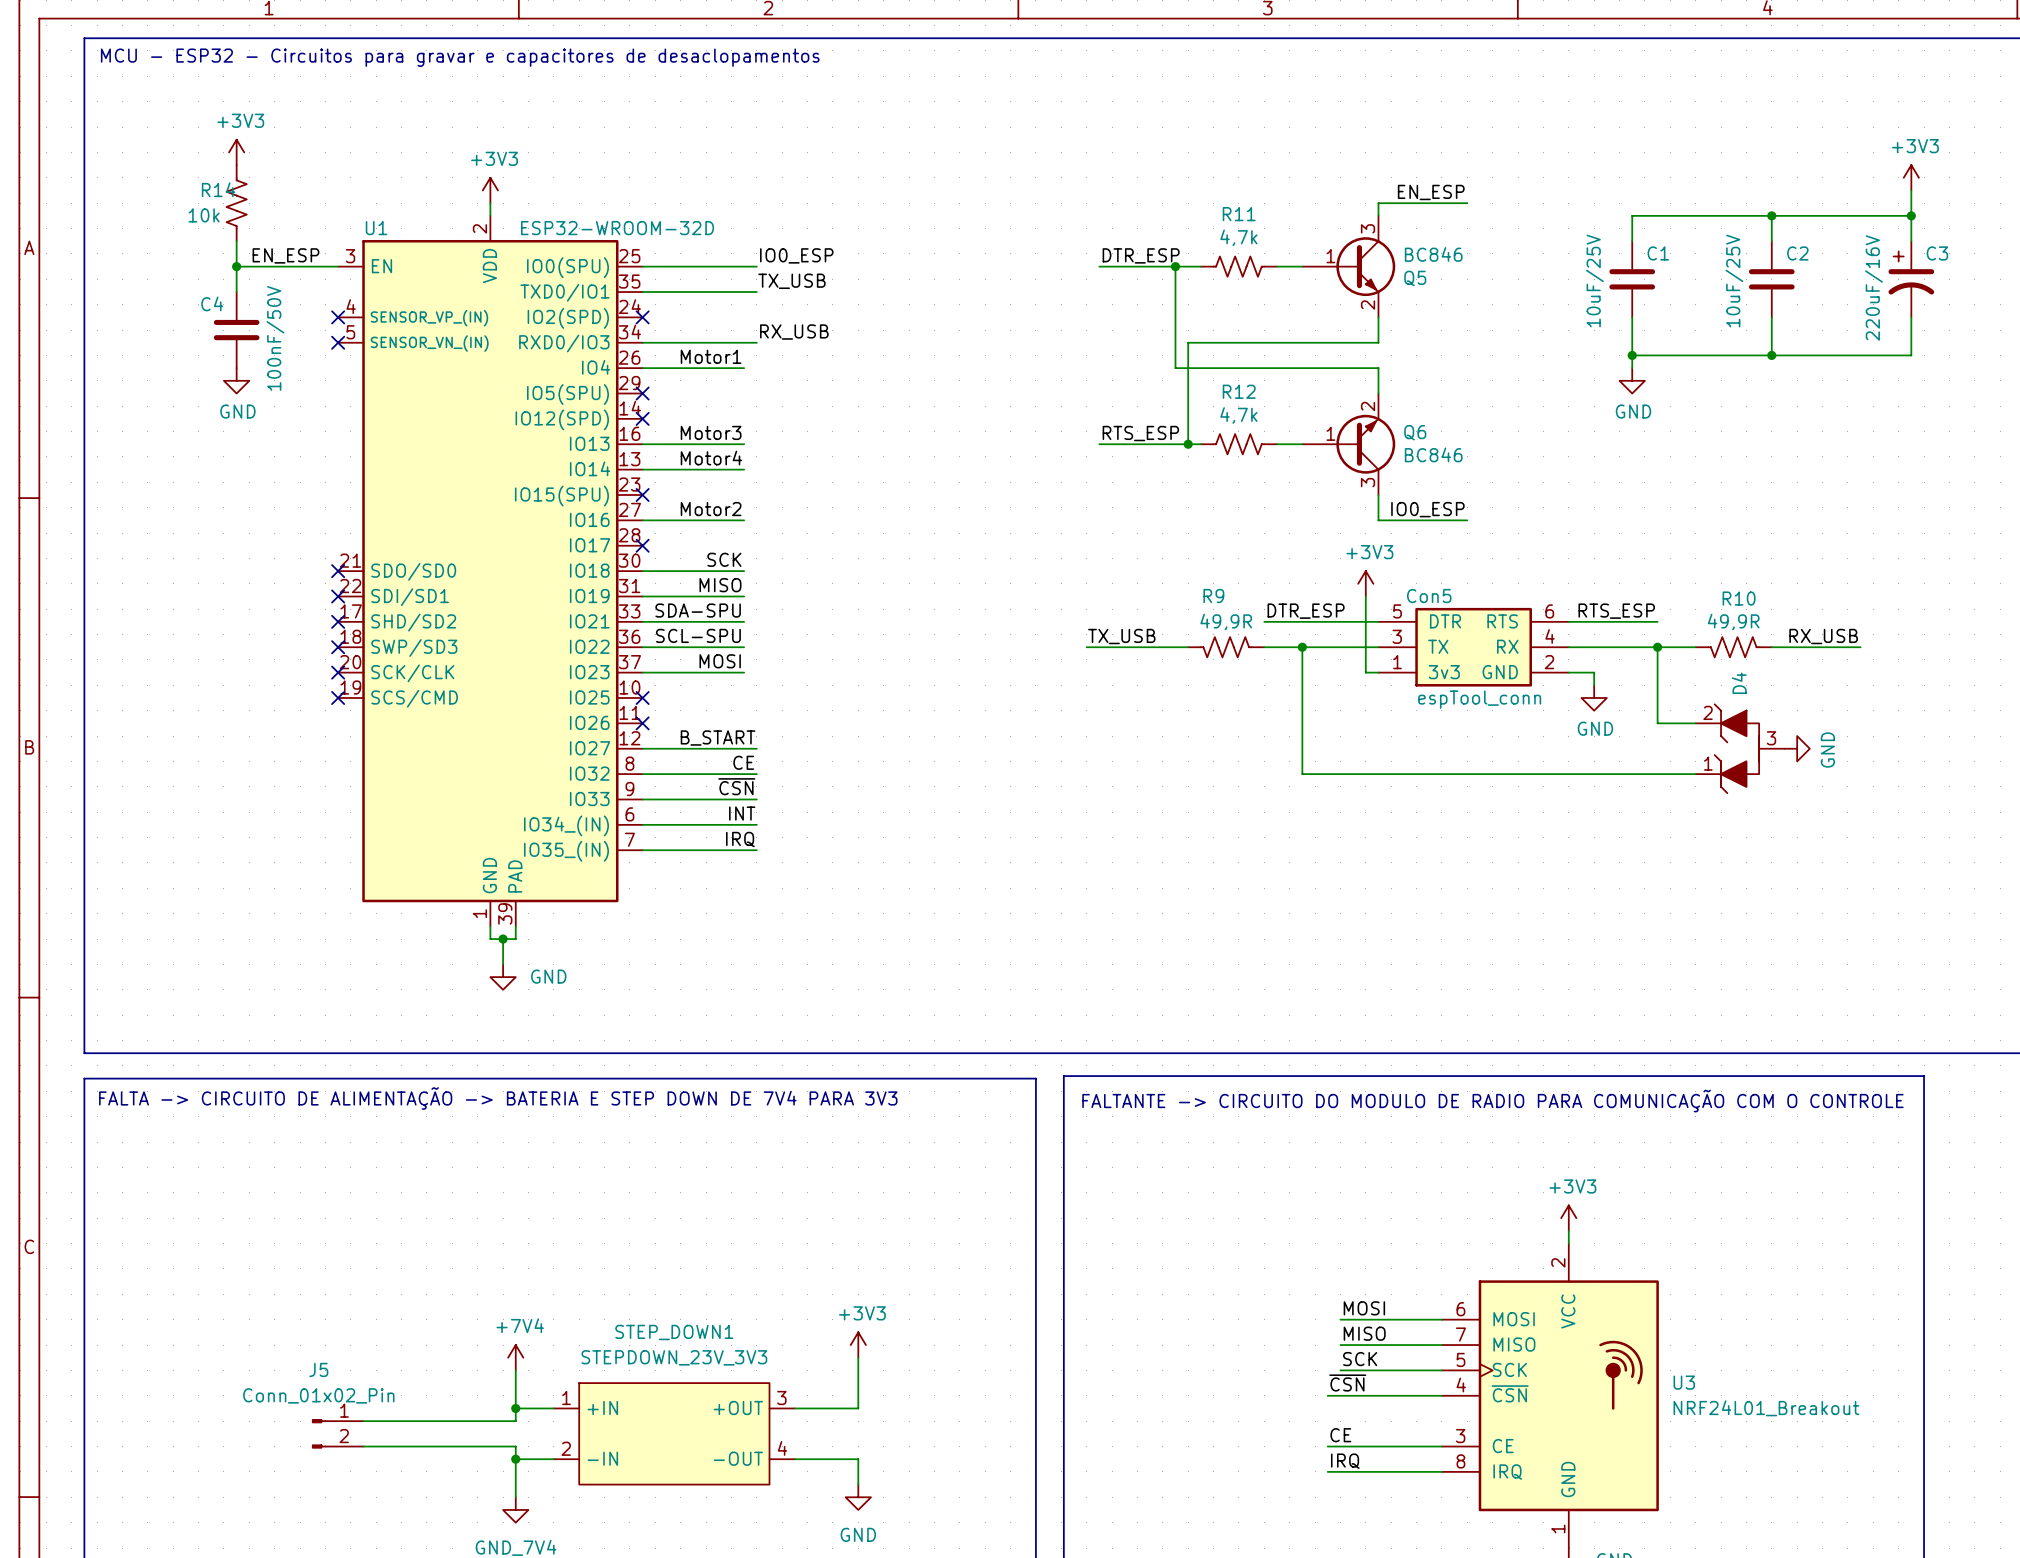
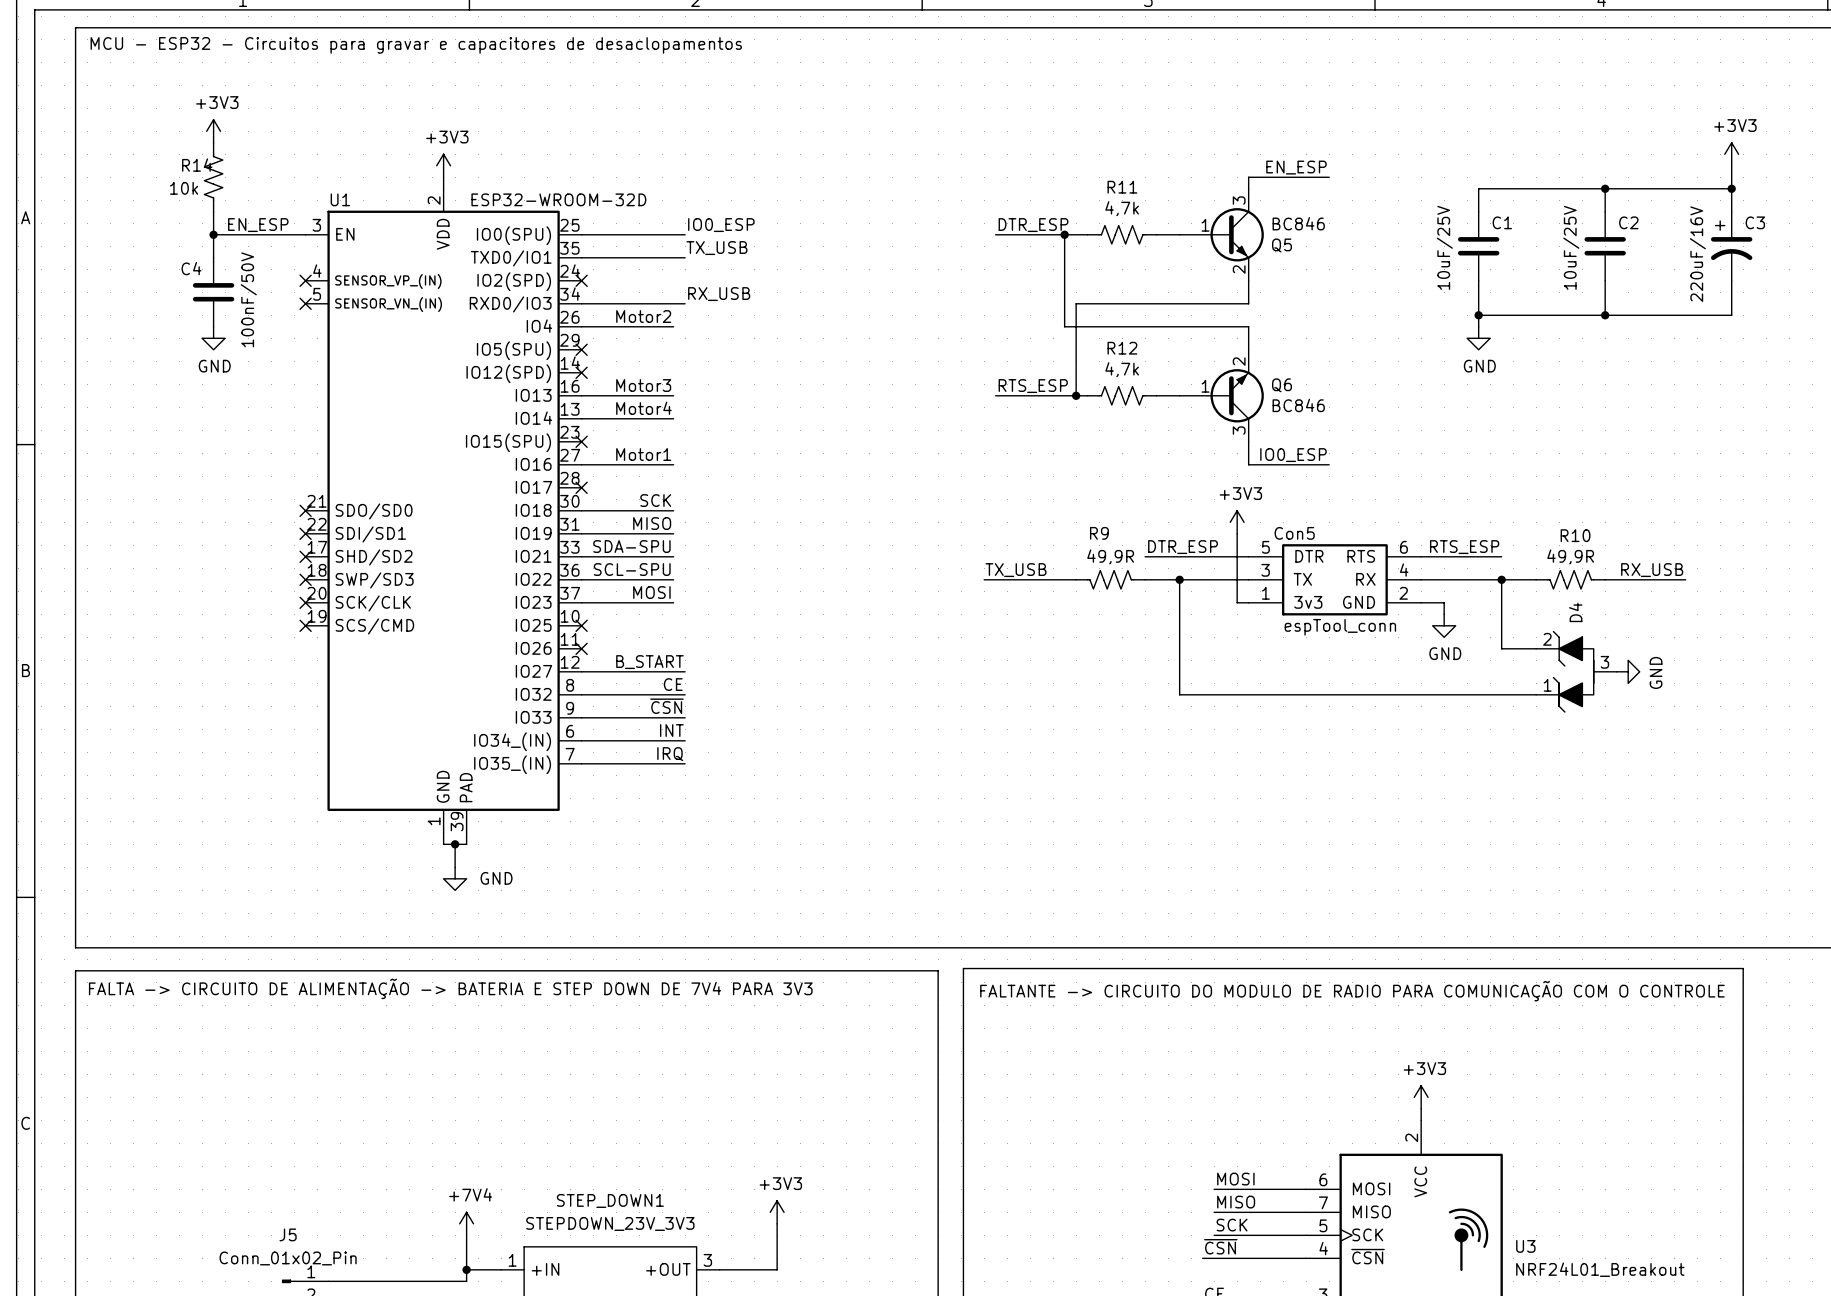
label: Motor1 (711, 356) -> Motor2 (643, 316)
label: Motor2 (711, 509) -> Motor1 (643, 454)

